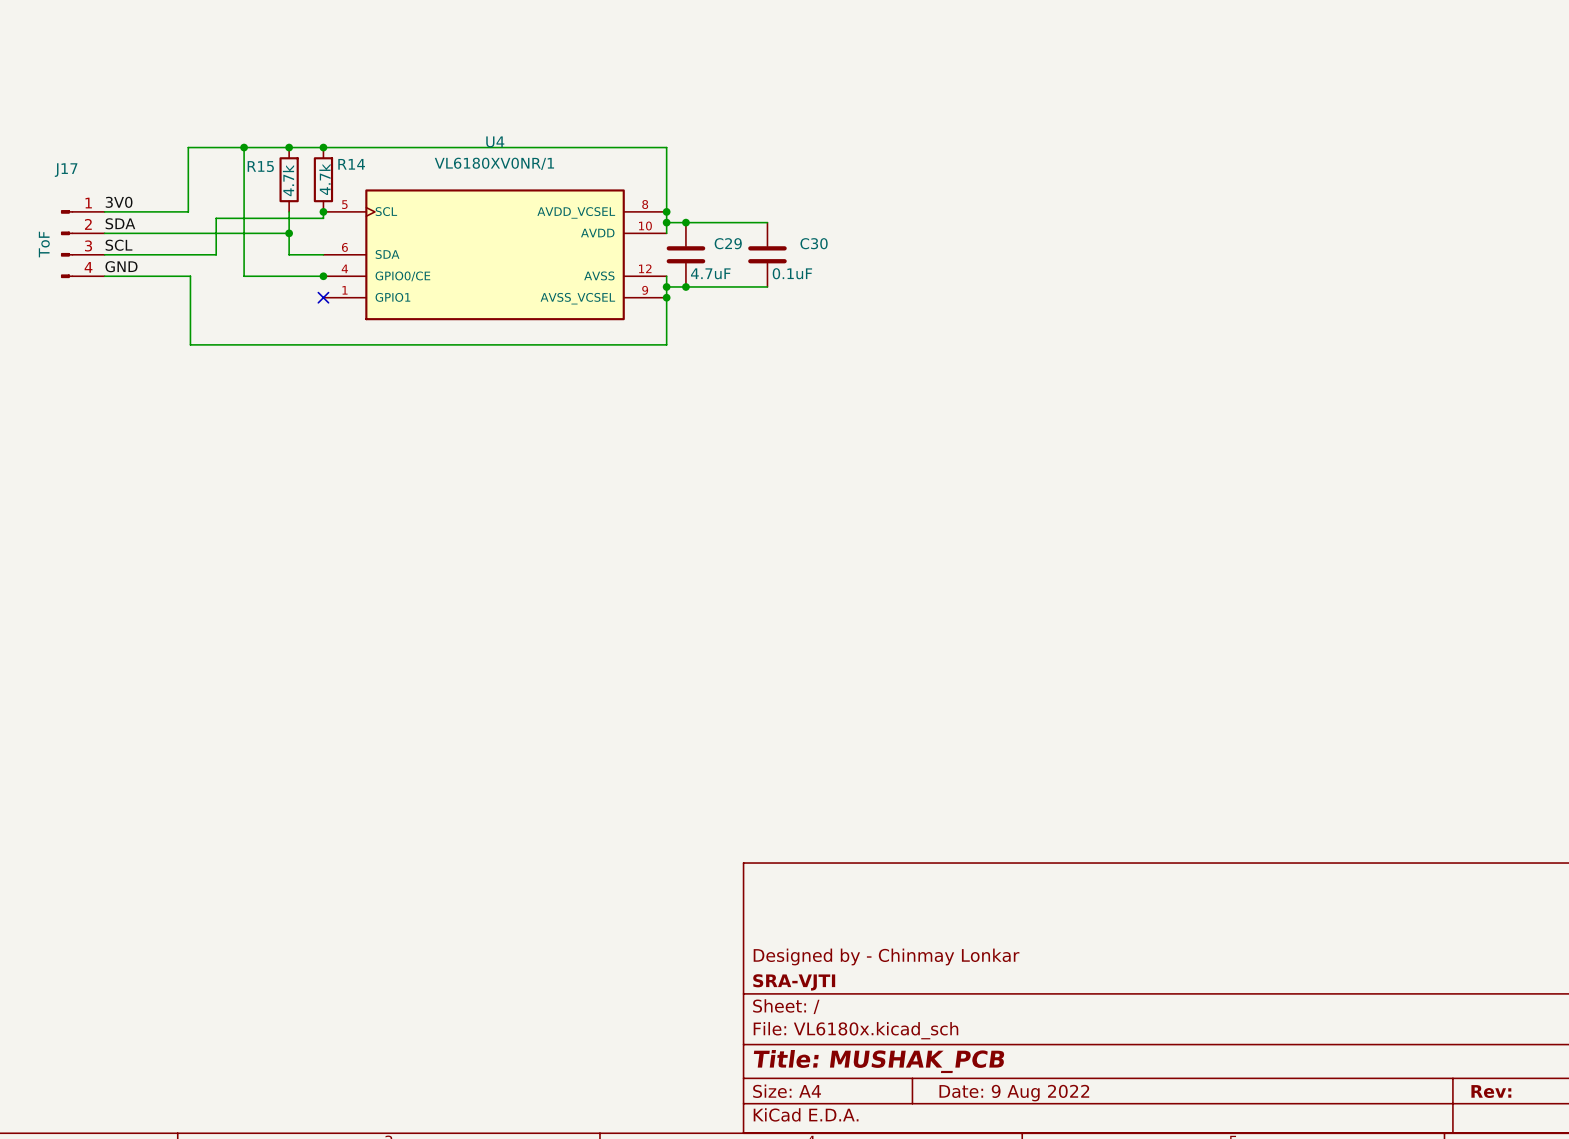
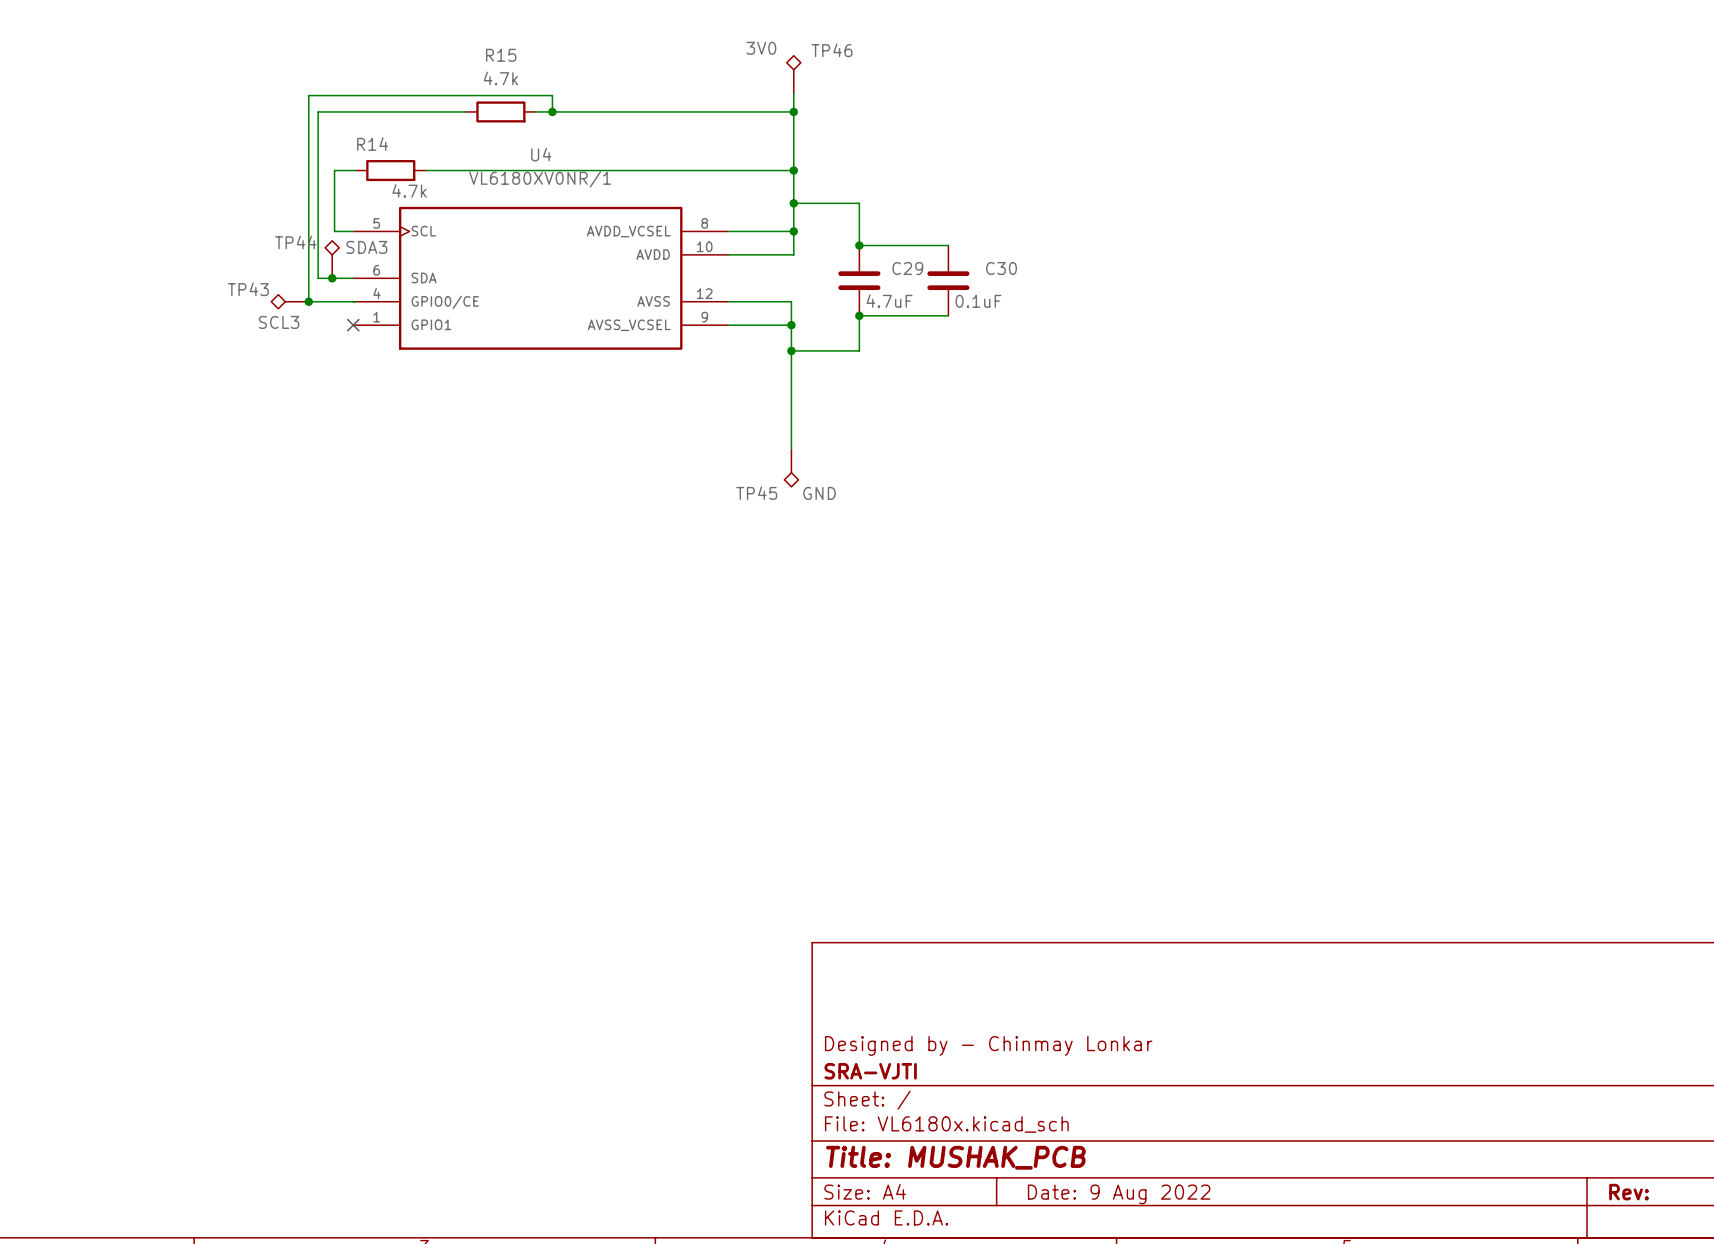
TP46: none -> 3V0 (793, 74)
wire: none -> (536, 111) (793, 111)
junction: none -> (552, 111)
junction: none -> (793, 111)
wire: (244, 147) (244, 276) (282, 276) -> (552, 111) (552, 95) (308, 95) (308, 301)
junction: (244, 147) -> none
junction: (289, 147) -> none
junction: (323, 147) -> none
wire: none -> (425, 170) (793, 170)
junction: none -> (793, 170)
R14 name position: R14 (351, 164) -> R14 (372, 144)
R15 name position: R15 (260, 166) -> R15 (501, 55)
R15 rotation: 0° (289, 179) -> 90° clockwise (500, 111)
R15 position: (289, 179) -> (500, 111)
R14 rotation: 0° (323, 179) -> 90° clockwise (390, 170)
R14 position: (323, 179) -> (390, 170)
R14 value position: 4.7k (324, 179) -> 4.7k (409, 190)
R15 value position: 4.7k (288, 180) -> 4.7k (500, 78)
wire: none -> (793, 203) (859, 203) (859, 245) (948, 245)
junction: none -> (793, 203)
label: 3V0 (119, 202) -> none
wire: (104, 211) (188, 211) (188, 147) (666, 147) (666, 233) -> (793, 93) (793, 254) (728, 254)
wire: (289, 211) (289, 254) (291, 254) -> (465, 111) (318, 111) (318, 278)
wire: (323, 211) (323, 218) (216, 218) (216, 254) (104, 254) -> (353, 231) (334, 231) (334, 170) (355, 170)
junction: (323, 211) -> none
wire: none -> (728, 231) (793, 231)
junction: (666, 211) -> none
junction: none -> (793, 231)
wire: (666, 222) (767, 222) -> none
junction: (666, 222) -> none
junction: (685, 222) -> none
label: SDA (120, 223) -> none
junction: none -> (859, 245)
wire: (104, 233) (289, 233) -> none
junction: (289, 233) -> none
TP44: none -> SDA3 (332, 259)
J17: ToF (82, 244) -> none
label: SCL (119, 245) -> none
junction: none -> (332, 278)
C29 position: (685, 254) -> (859, 280)
C30 position: (767, 254) -> (948, 280)
label: GND (121, 266) -> none
wire: (104, 276) (190, 276) (190, 344) (666, 344) (666, 276) -> (791, 449) (791, 301) (728, 301)
TP43: none -> SCL3 (290, 301)
junction: none -> (308, 301)
junction: (323, 276) -> none
wire: (666, 286) (767, 286) -> none
junction: (666, 286) -> none
junction: (685, 286) -> none
junction: none -> (859, 315)
wire: none -> (948, 315) (859, 315) (859, 350) (791, 350)
wire: none -> (728, 325) (791, 325)
junction: (666, 297) -> none
junction: none -> (791, 325)
junction: none -> (791, 350)
TP45: none -> GND (791, 468)

